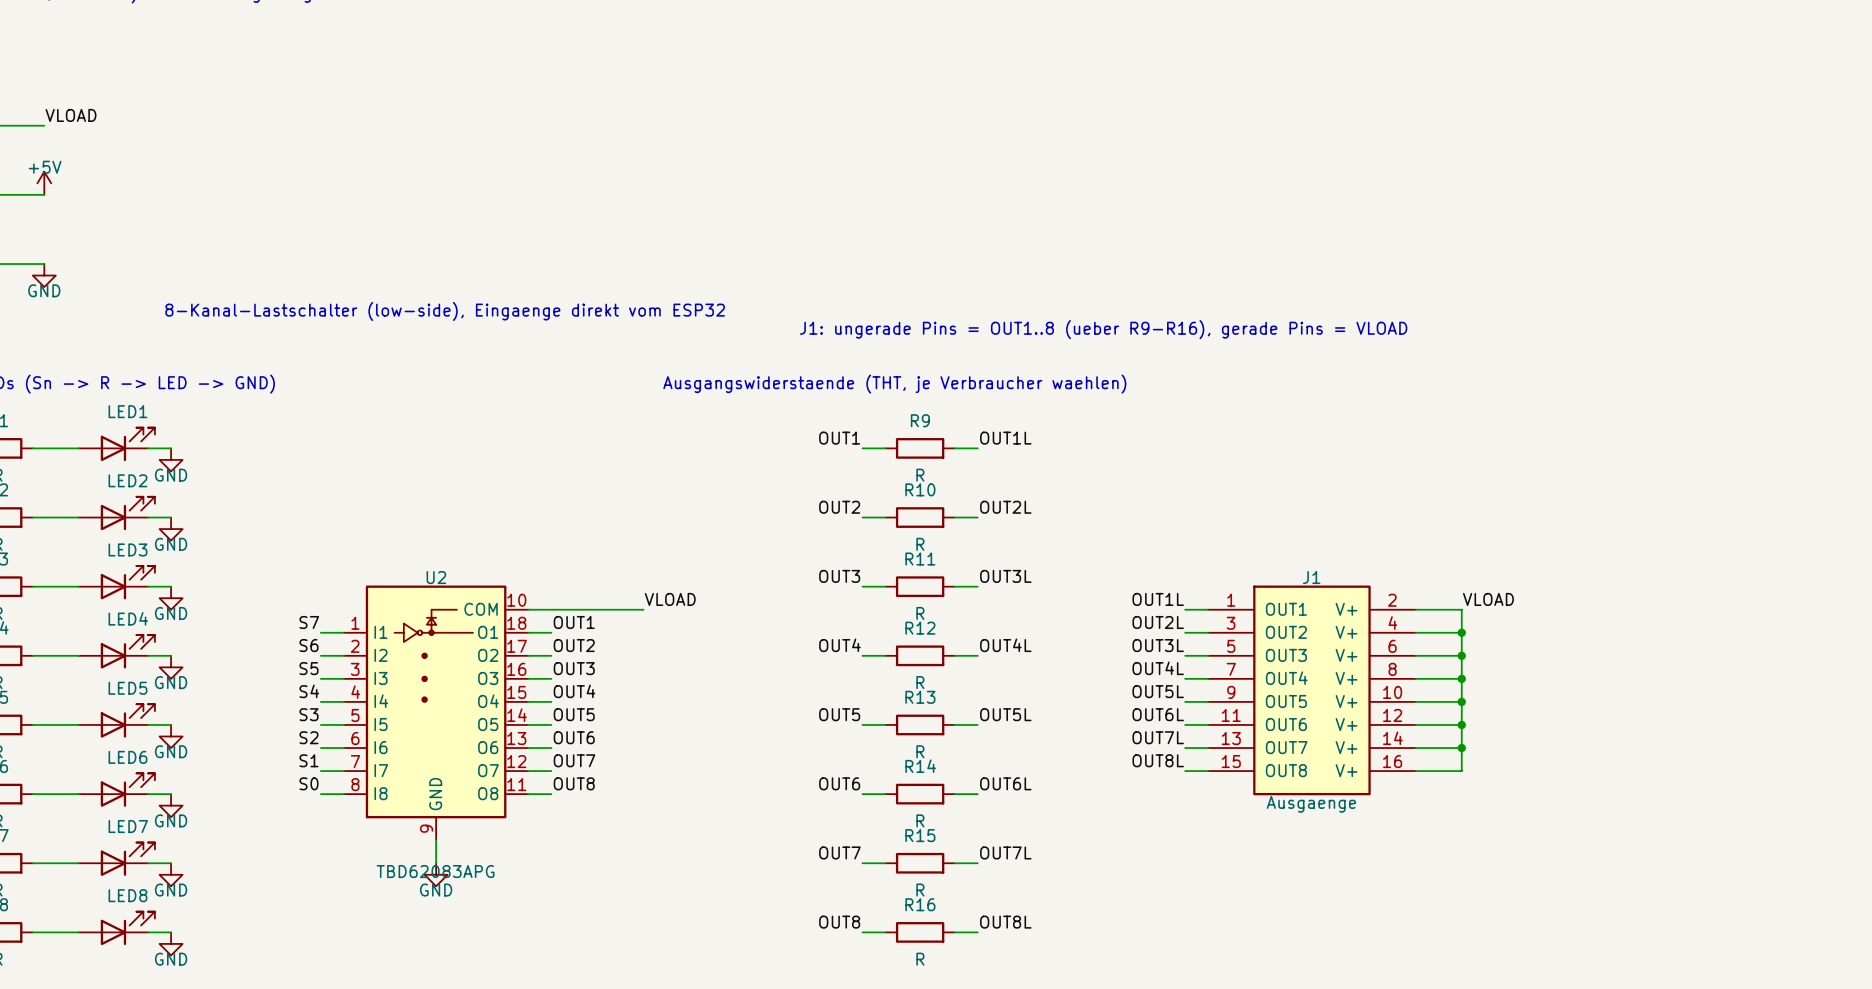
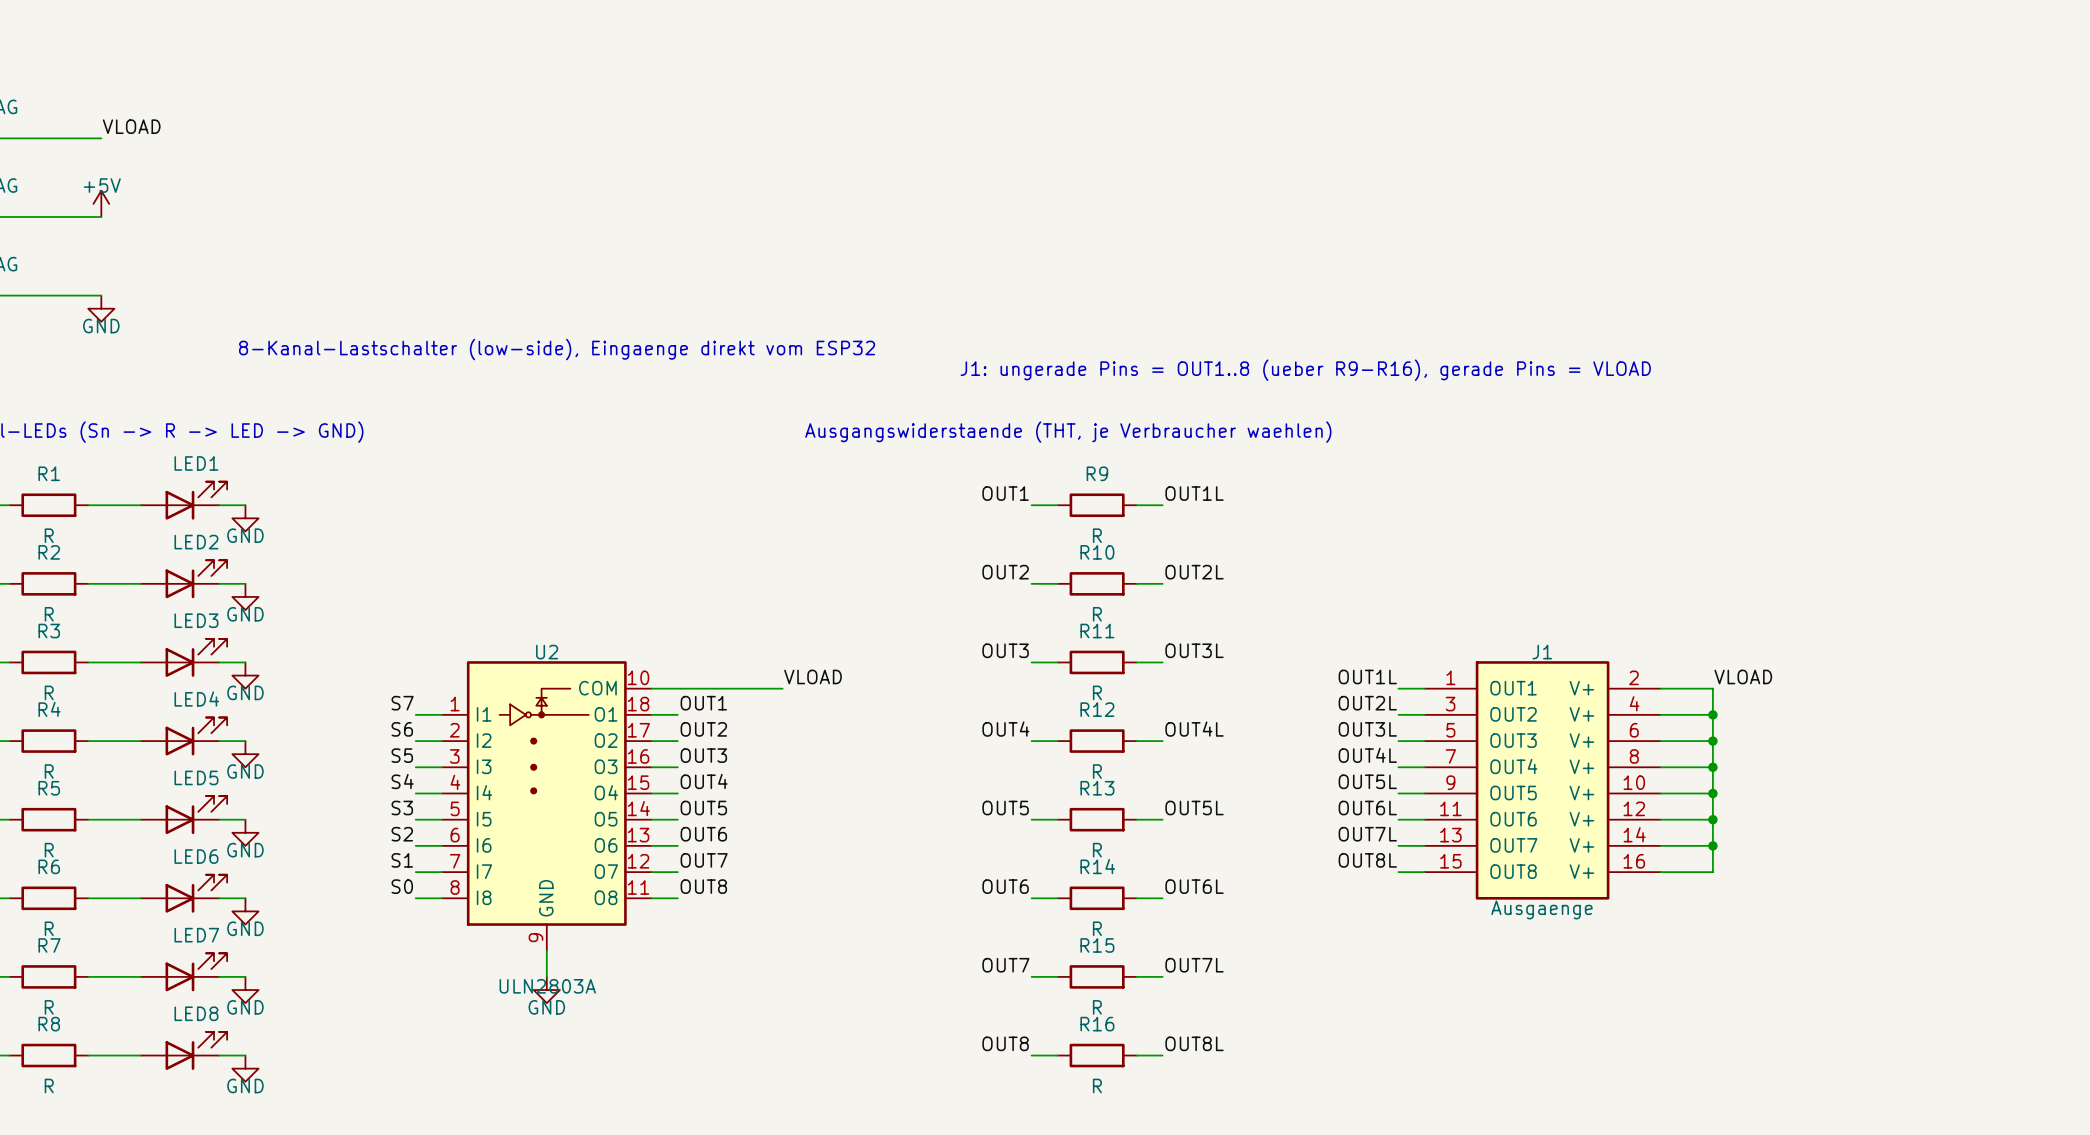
U2 value: TBD62083APG (435, 871) -> ULN2803A (547, 986)

